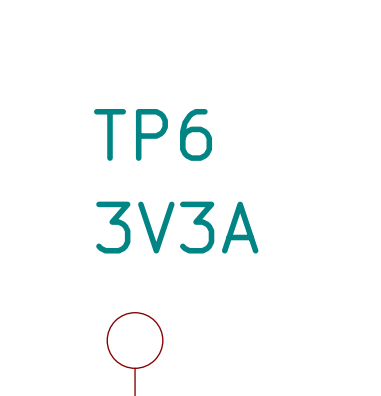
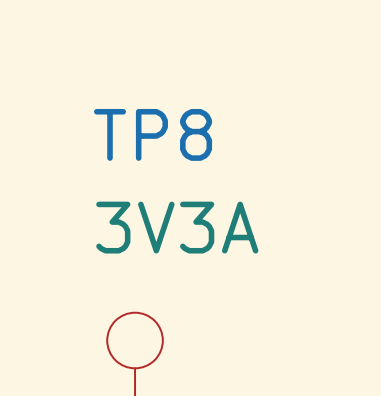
TP6 name: TP6 (153, 134) -> TP8 (153, 134)

